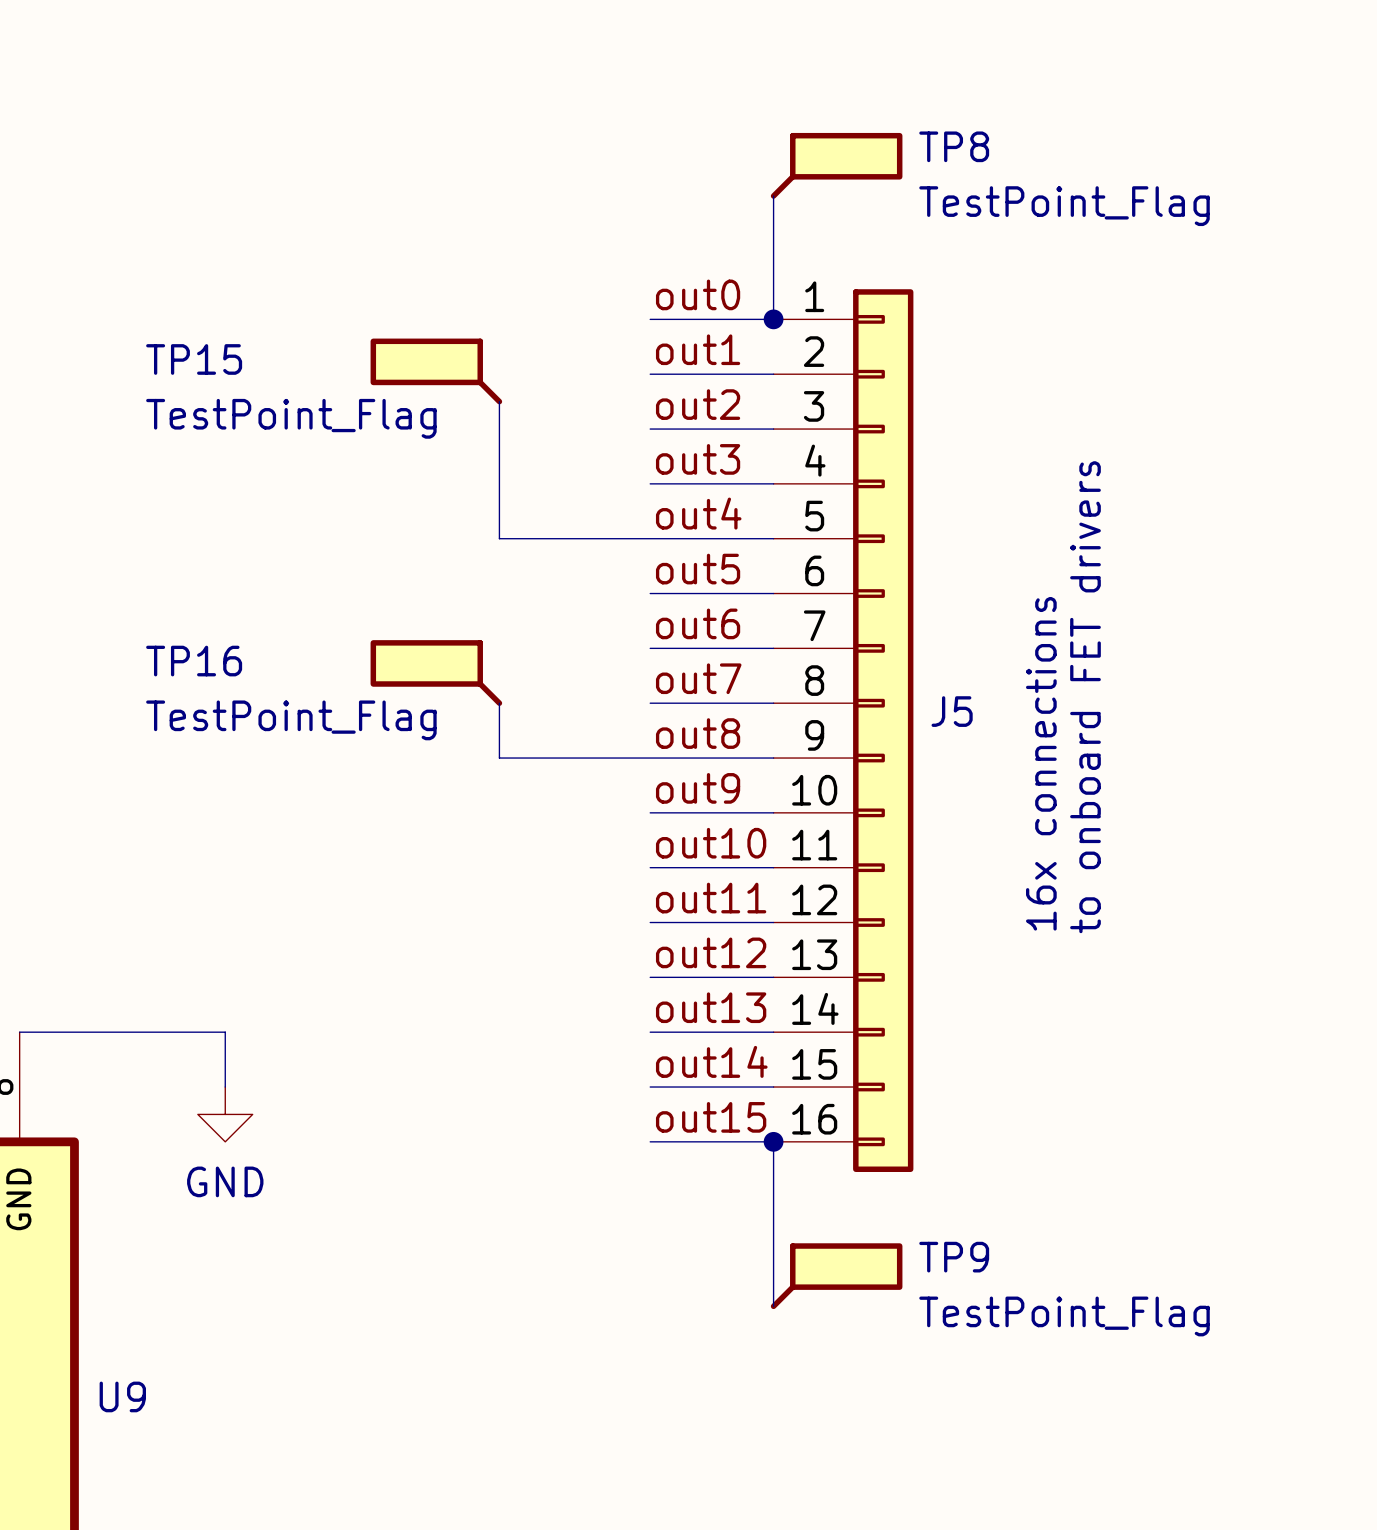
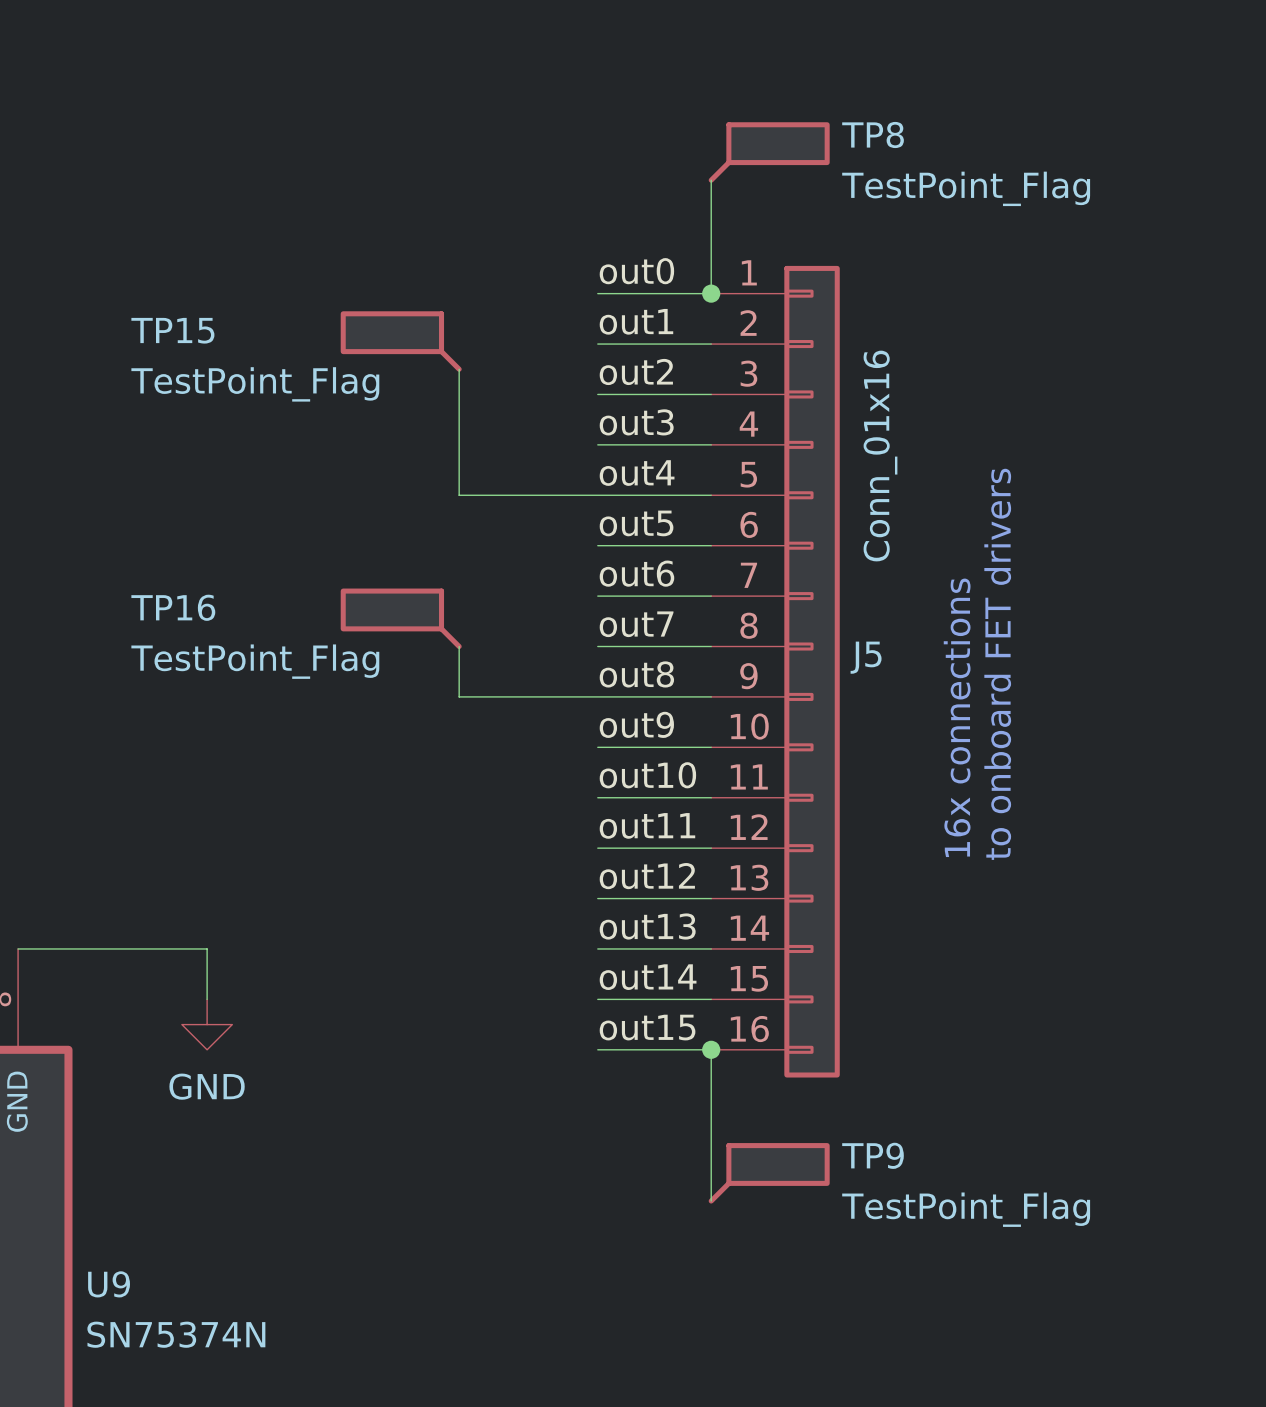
J5 value: none -> Conn_01x16 (880, 456)
U9 value: none -> SN75374N (176, 1334)

